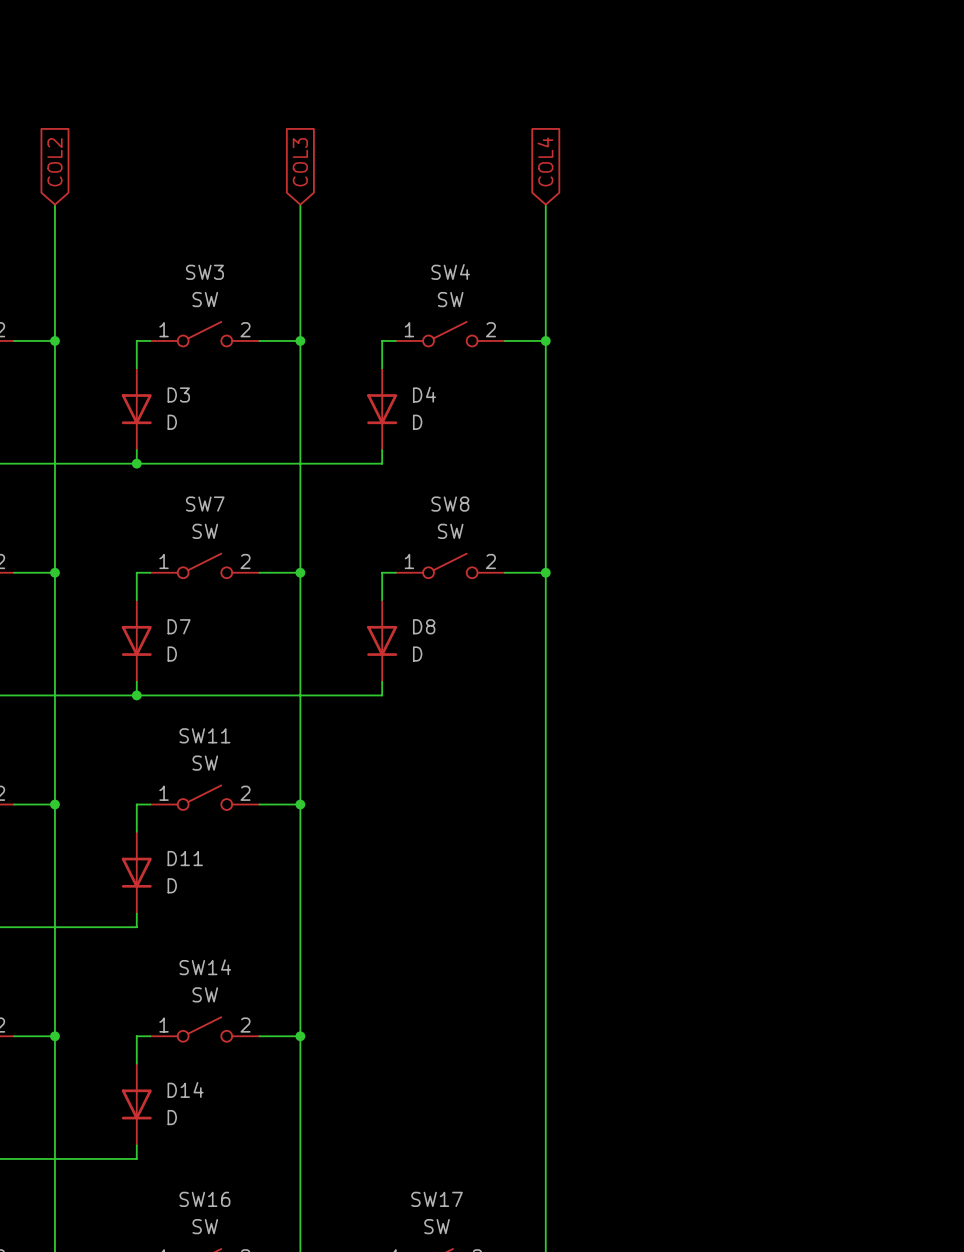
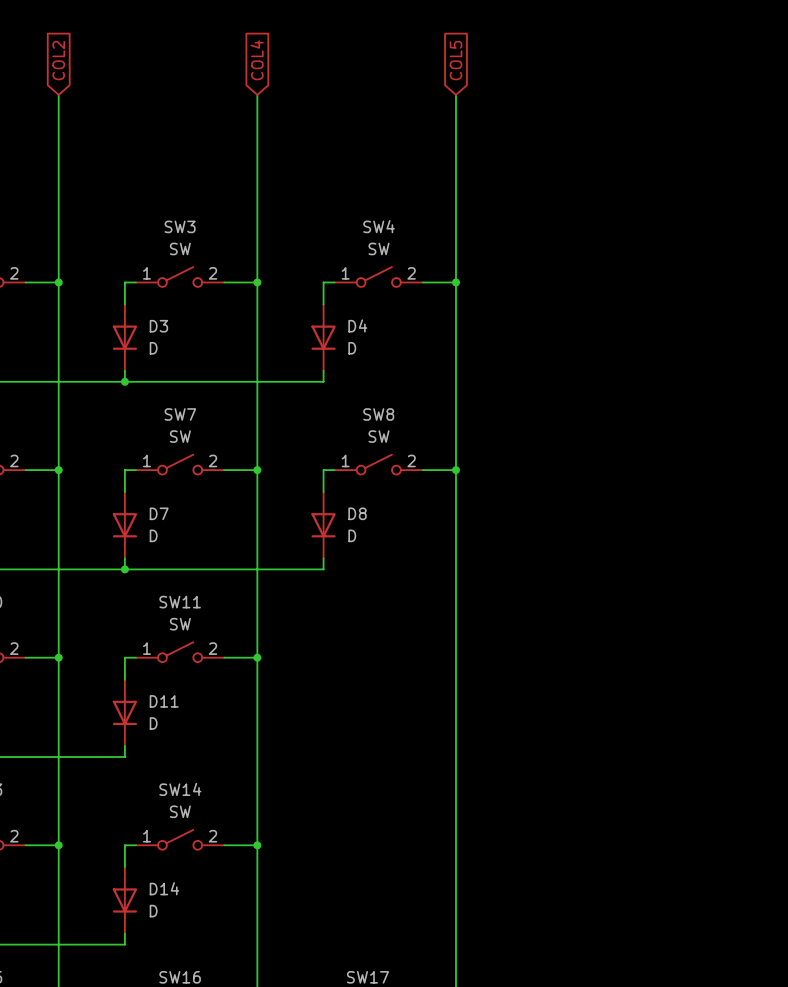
global label: none -> COL5 (455, 60)
wire: none -> (58, 94) (58, 172)
wire: none -> (257, 94) (257, 172)
wire: none -> (455, 94) (455, 172)
global label position: COL4 (545, 161) -> COL4 (257, 60)
global label position: COL2 (54, 162) -> COL2 (58, 60)
global label: COL3 (300, 162) -> none

